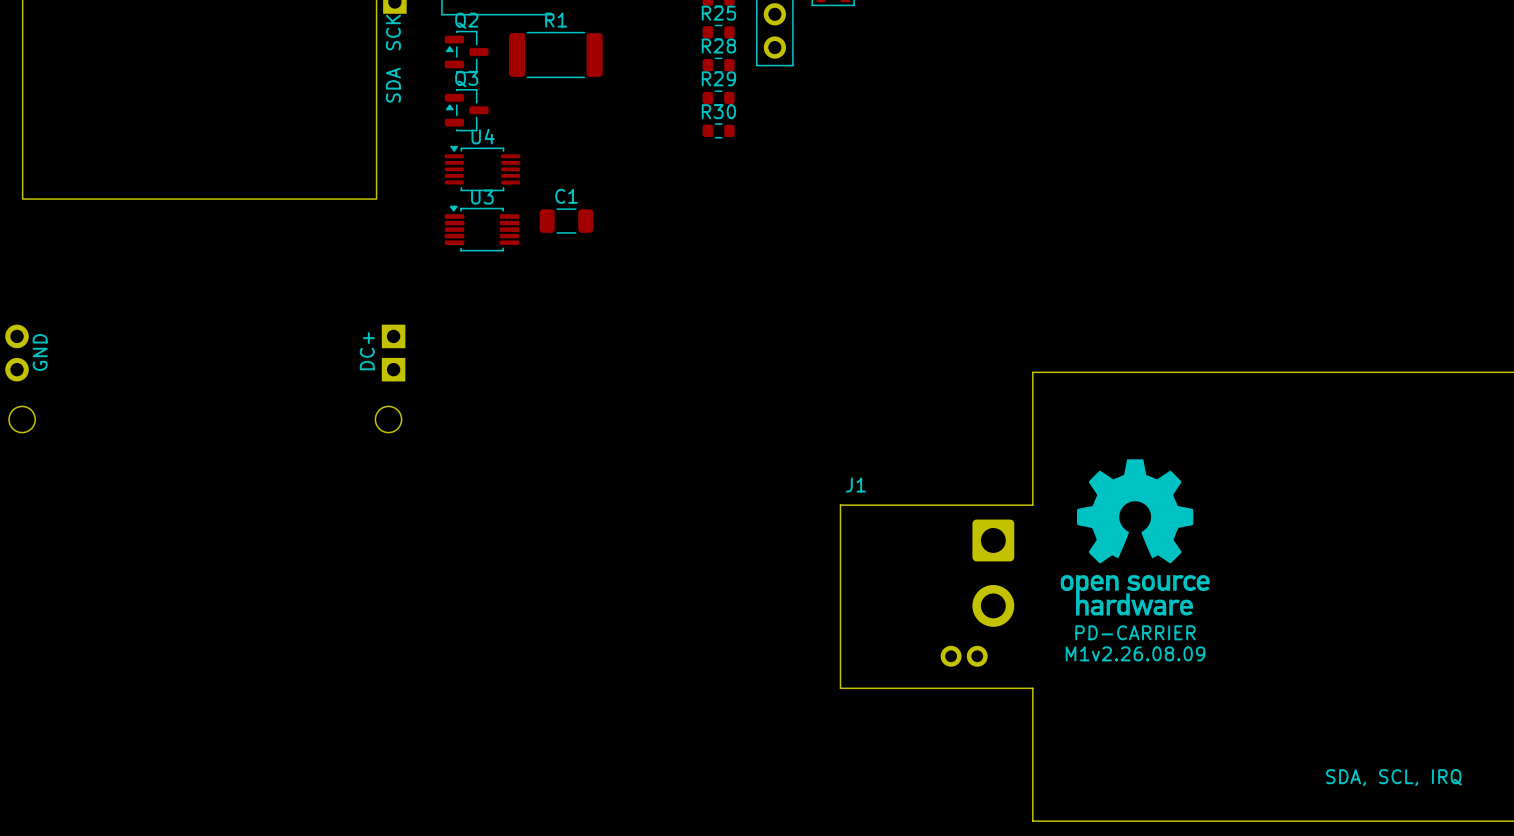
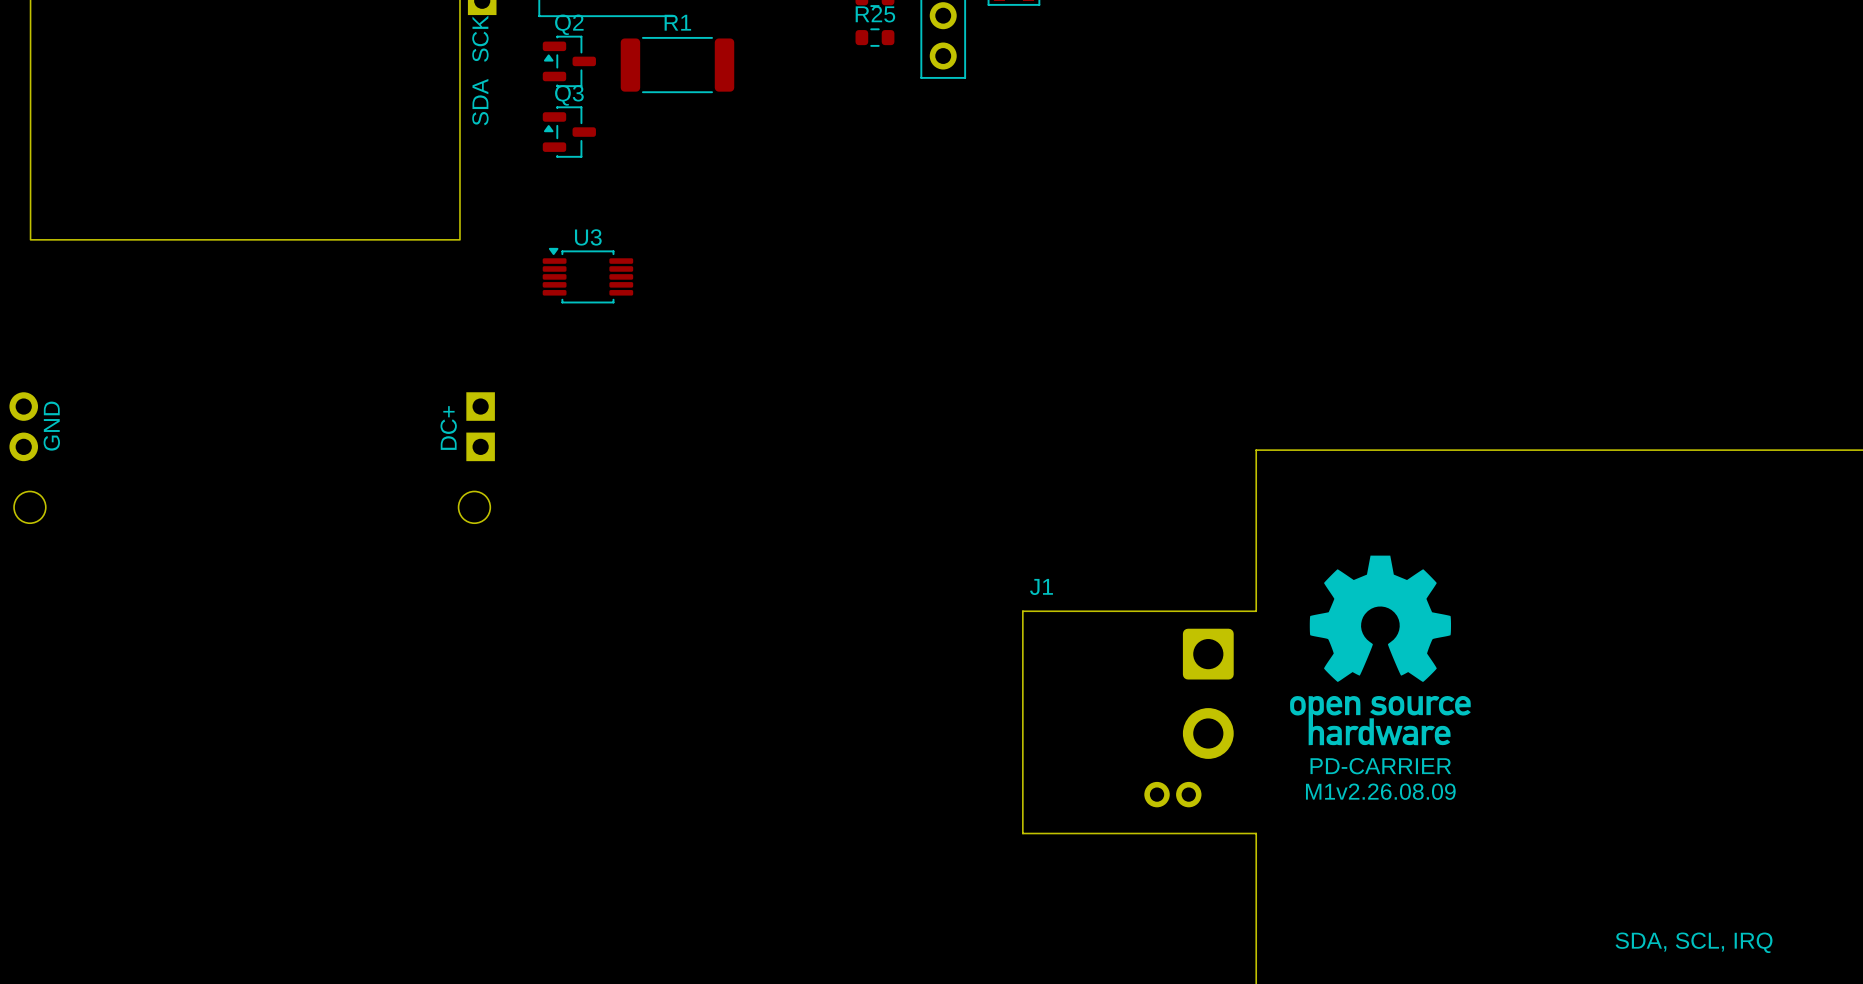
R28: (718, 65) -> none
R29: (718, 98) -> none
R30: (718, 130) -> none
U4: (482, 168) -> none
C1: (566, 221) -> none

